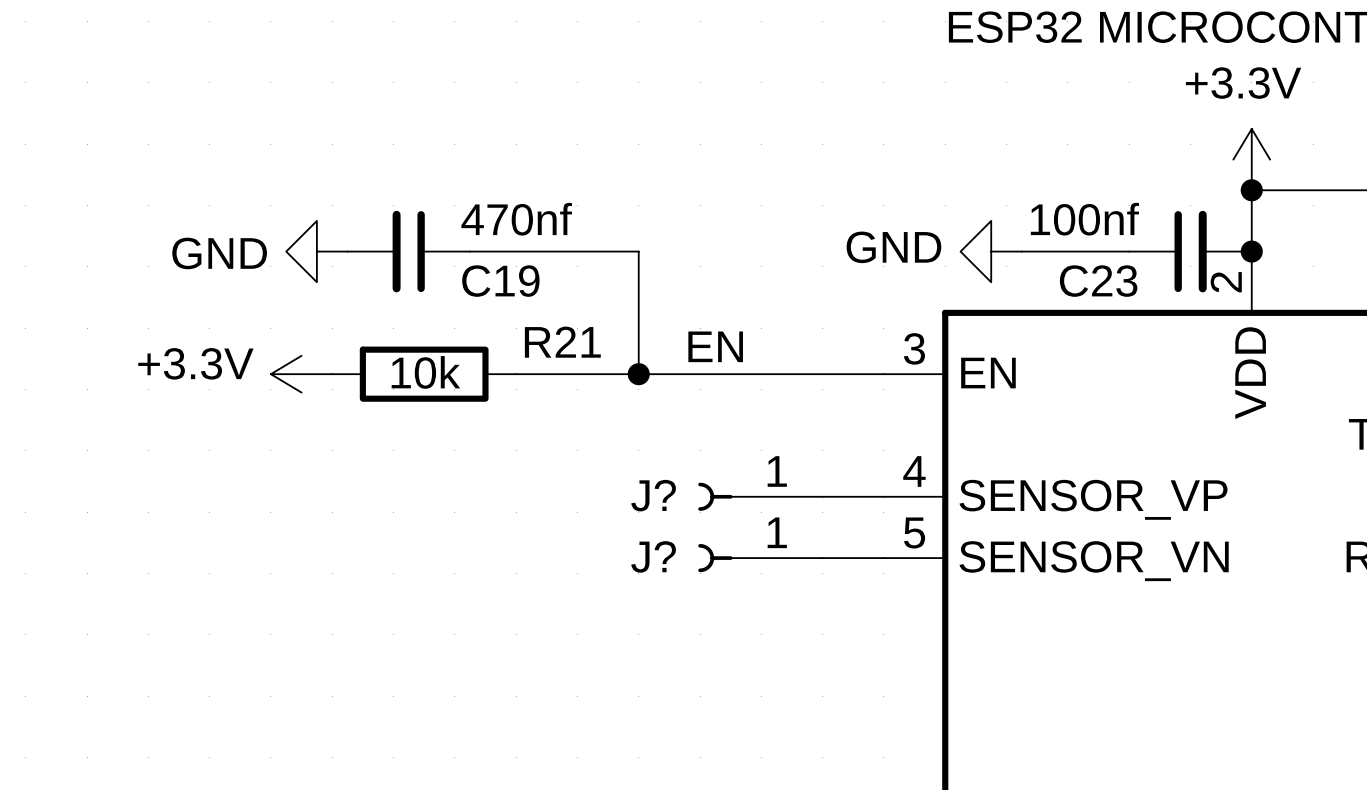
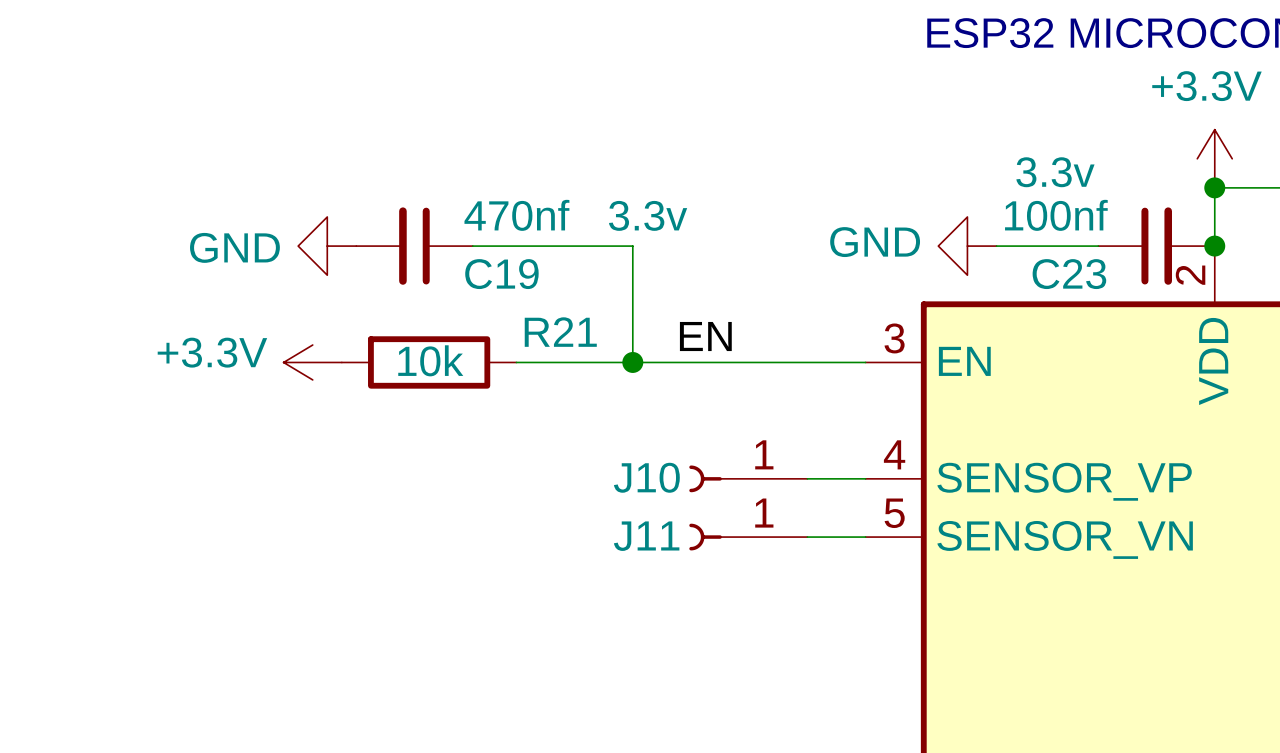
C23 text: none -> 3.3v (1055, 172)
C19 text: none -> 3.3v (648, 215)
J? name: J? (653, 495) -> J10 (646, 477)
J? name: J? (653, 556) -> J11 (646, 536)

